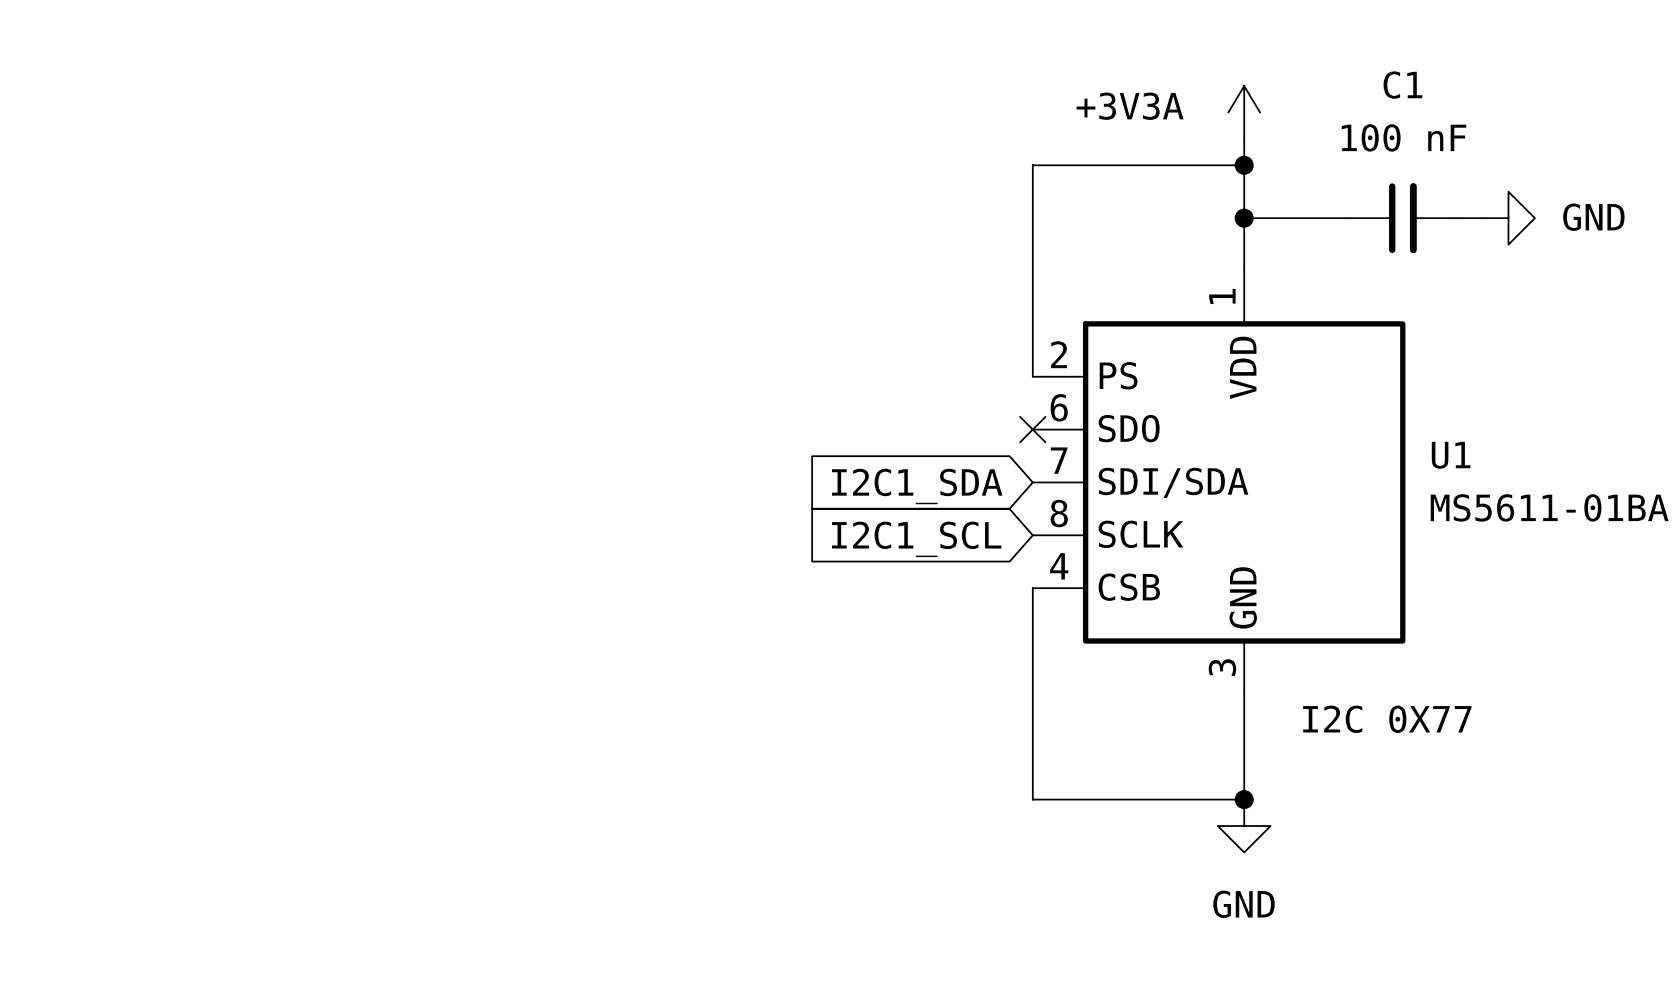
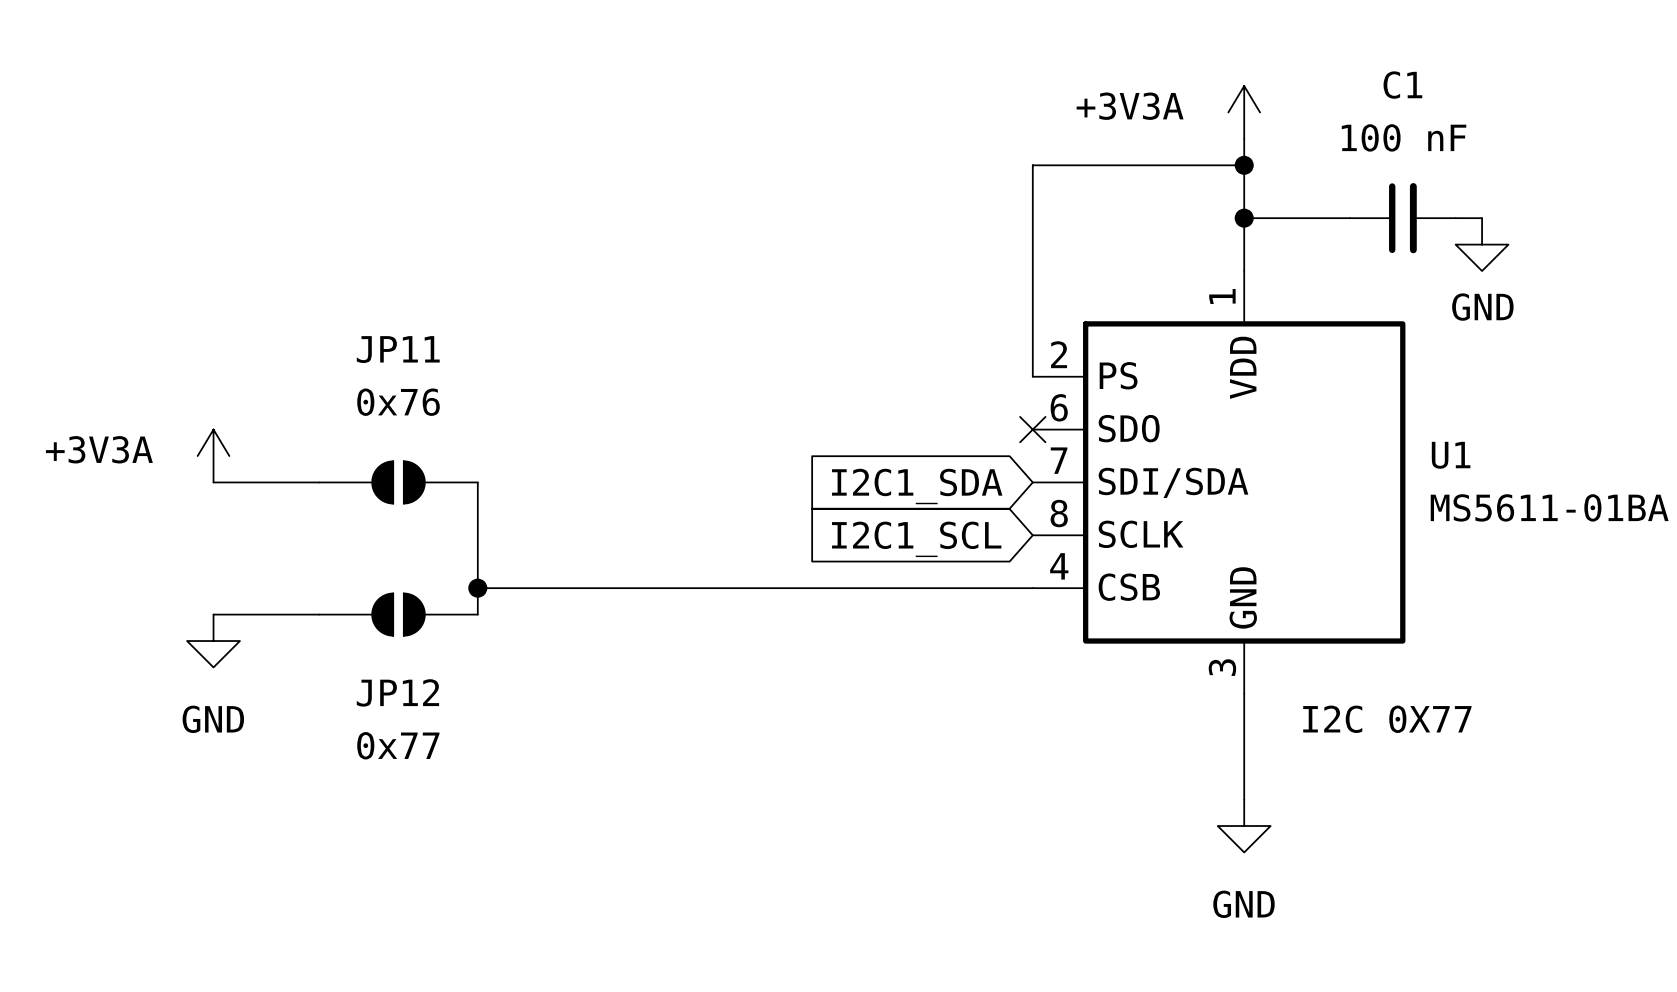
power symbol text position: GND (1593, 217) -> GND (1482, 307)
power symbol rotation: 0° (1508, 218) -> 90° clockwise (1482, 244)
power symbol position: GND (1508, 218) -> GND (1482, 244)
power symbol: none -> +3V3A (213, 456)
wire: none -> (213, 482) (319, 482)
JP11: none -> 0x76 (398, 482)
wire: none -> (477, 482) (477, 614)
junction: none -> (477, 588)
wire: (1032, 588) (1032, 799) (1244, 799) -> (1032, 588) (477, 588)
wire: none -> (213, 614) (319, 614)
JP12: none -> 0x77 (398, 614)
power symbol: none -> GND (213, 641)
junction: (1244, 799) -> none

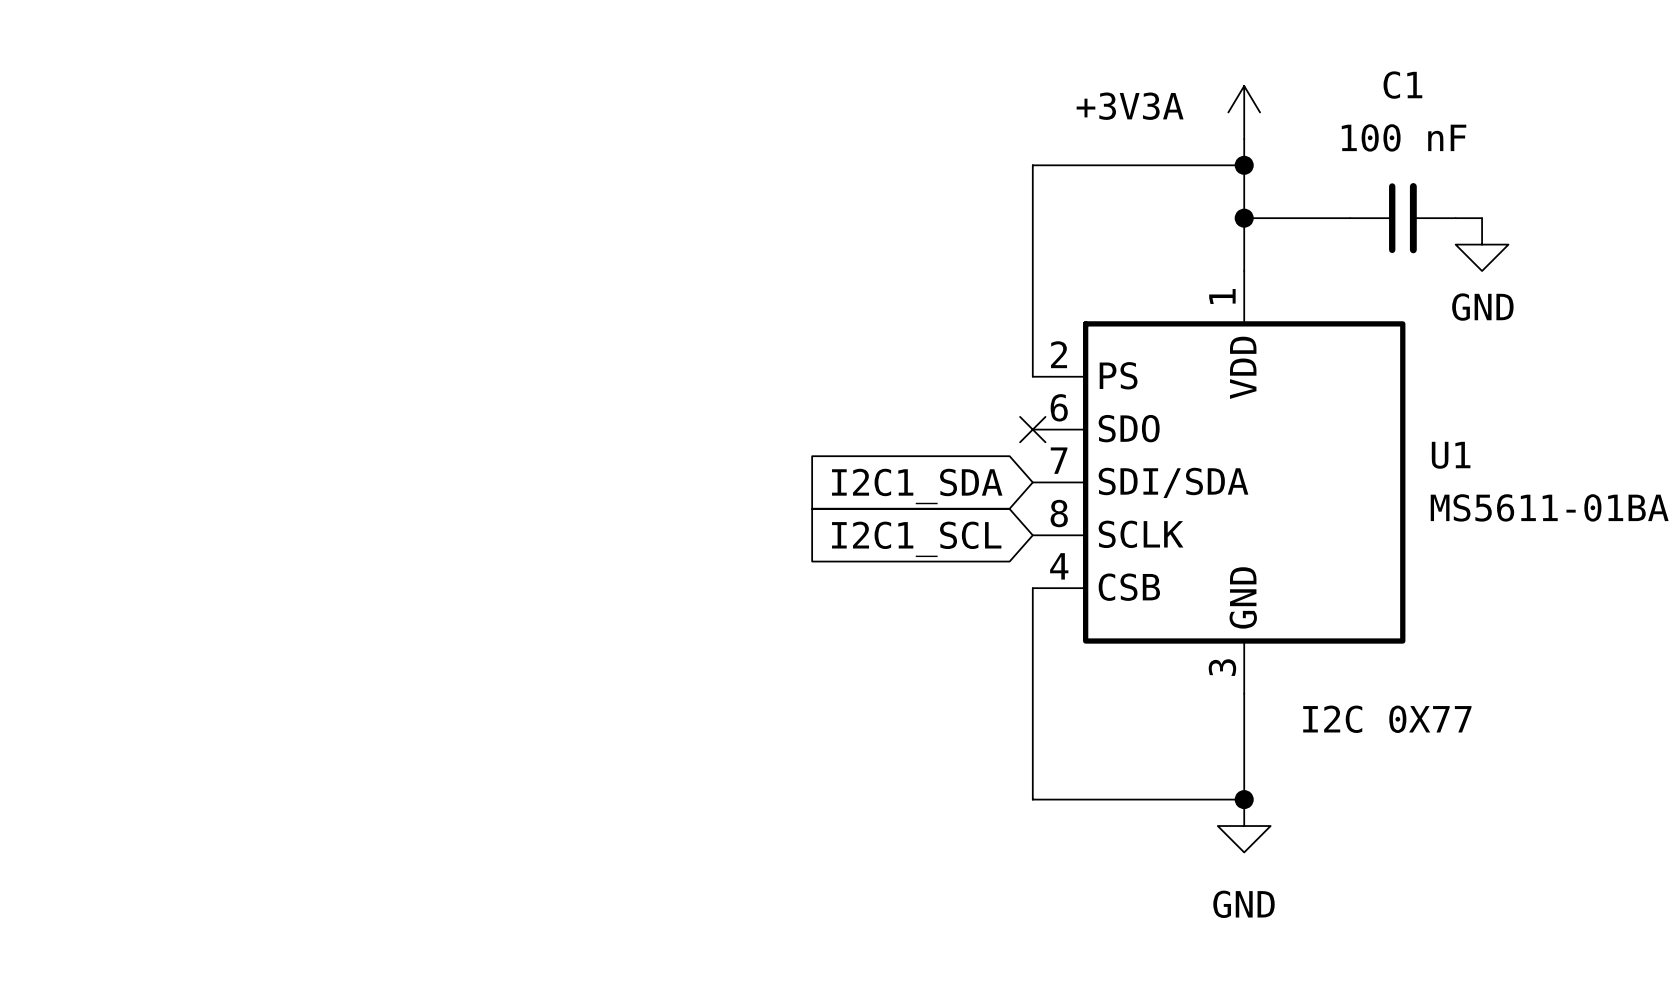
power symbol: +3V3A (213, 456) -> none
wire: (213, 482) (319, 482) -> none
JP11: 0x76 (398, 482) -> none
wire: (477, 482) (477, 614) -> none
wire: (477, 588) (1032, 588) -> (1244, 799) (1032, 799) (1032, 588)
junction: (477, 588) -> none
wire: (213, 614) (319, 614) -> none
JP12: 0x77 (398, 614) -> none
power symbol: GND (213, 641) -> none
junction: none -> (1244, 799)

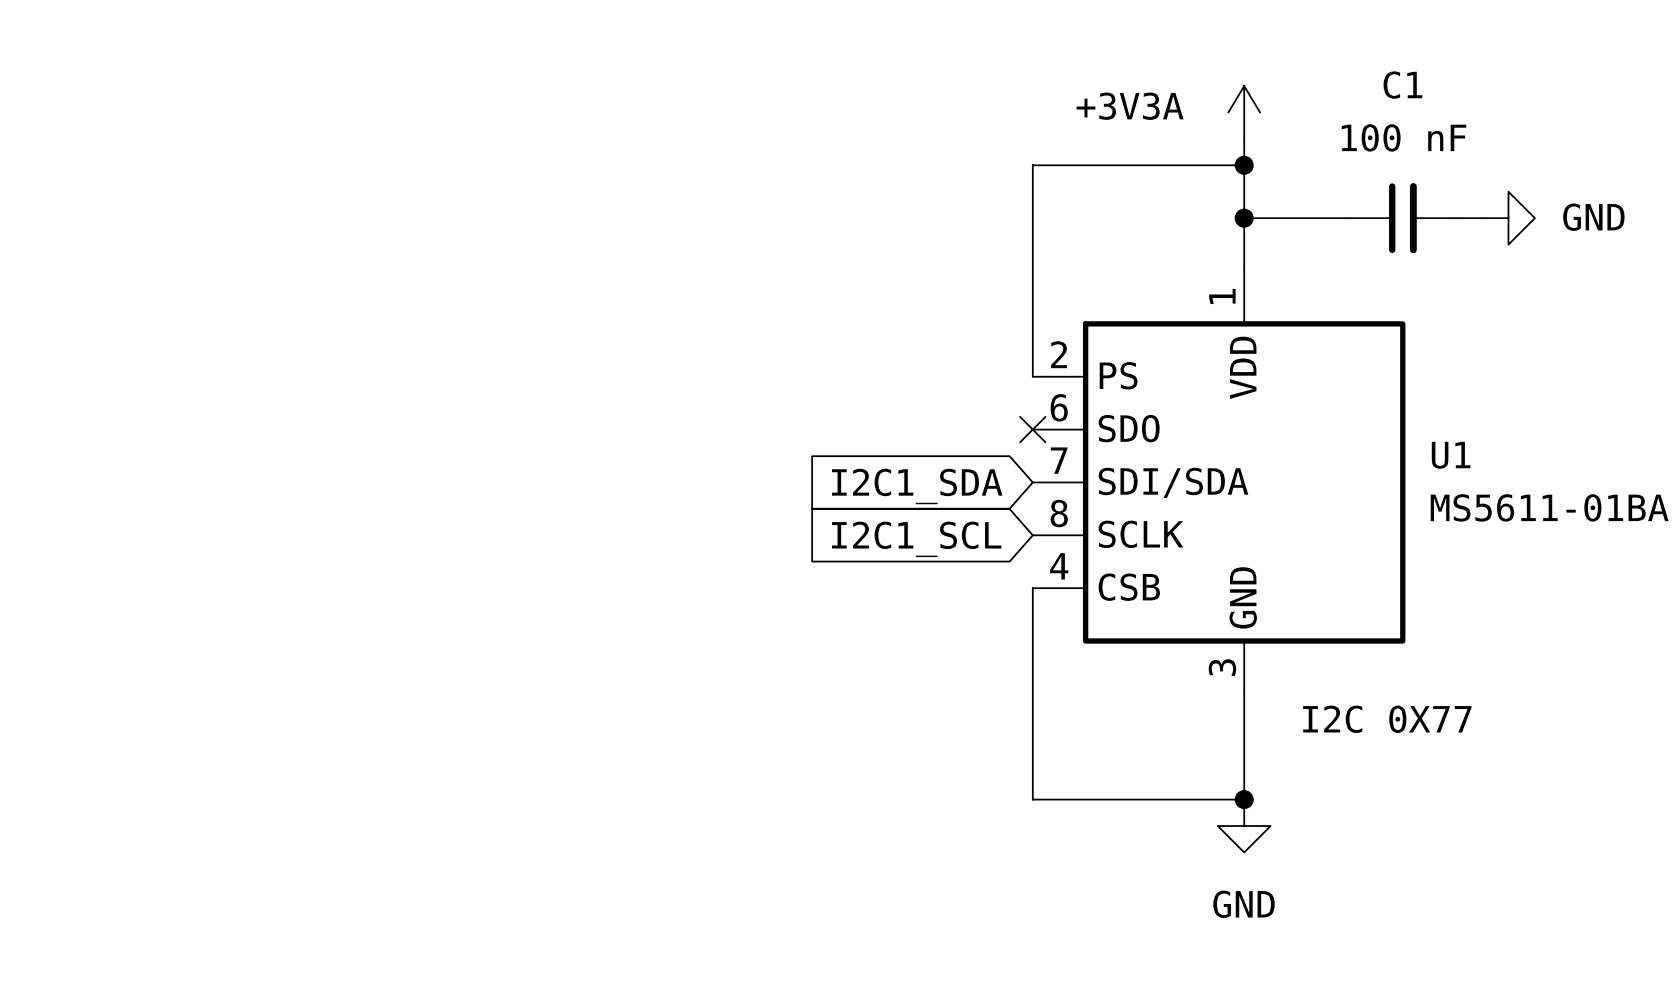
power symbol rotation: 0° (1482, 244) -> 90° counterclockwise (1508, 218)
power symbol position: GND (1482, 244) -> GND (1508, 218)
power symbol text position: GND (1482, 307) -> GND (1593, 217)

